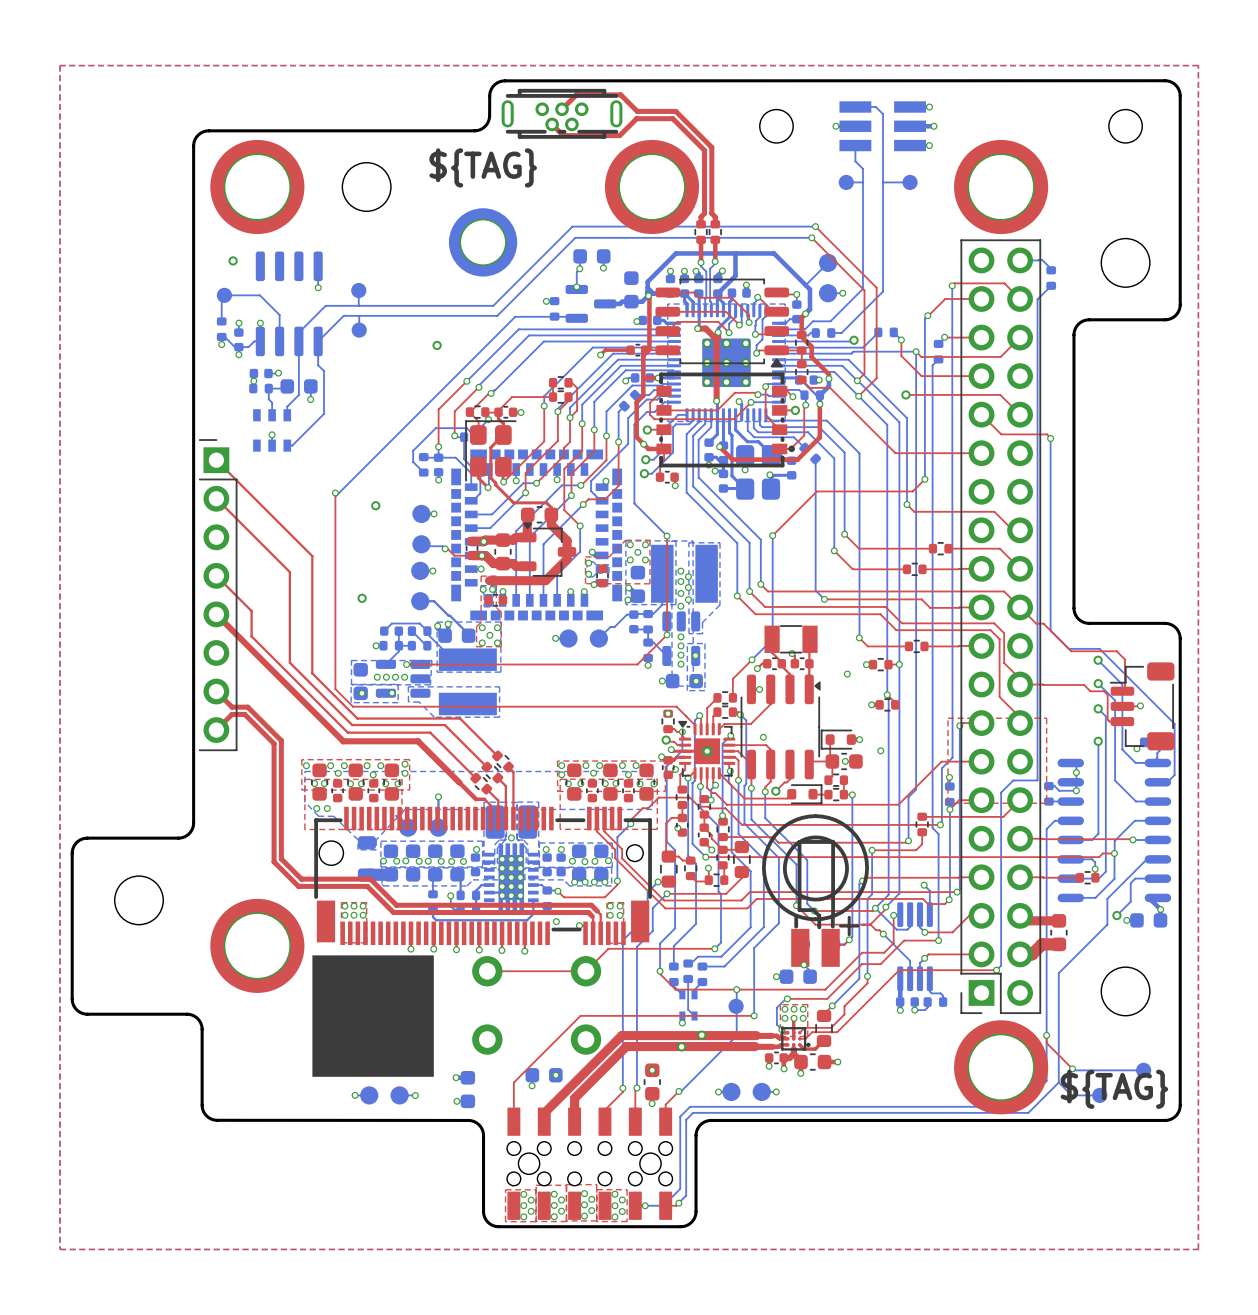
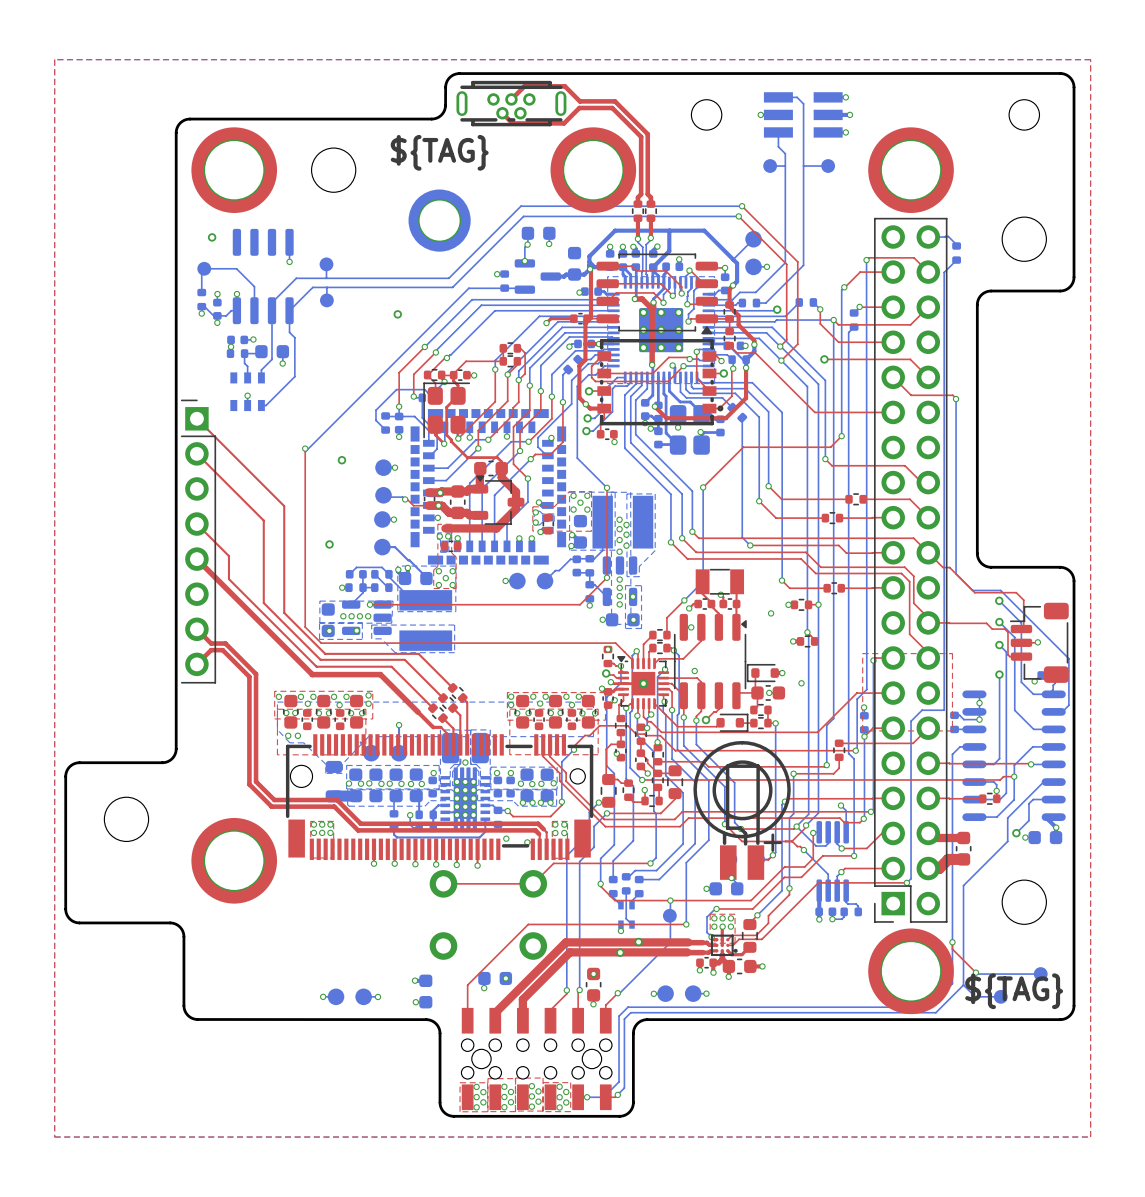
drawing: [312, 955, 434, 1077] -> none

